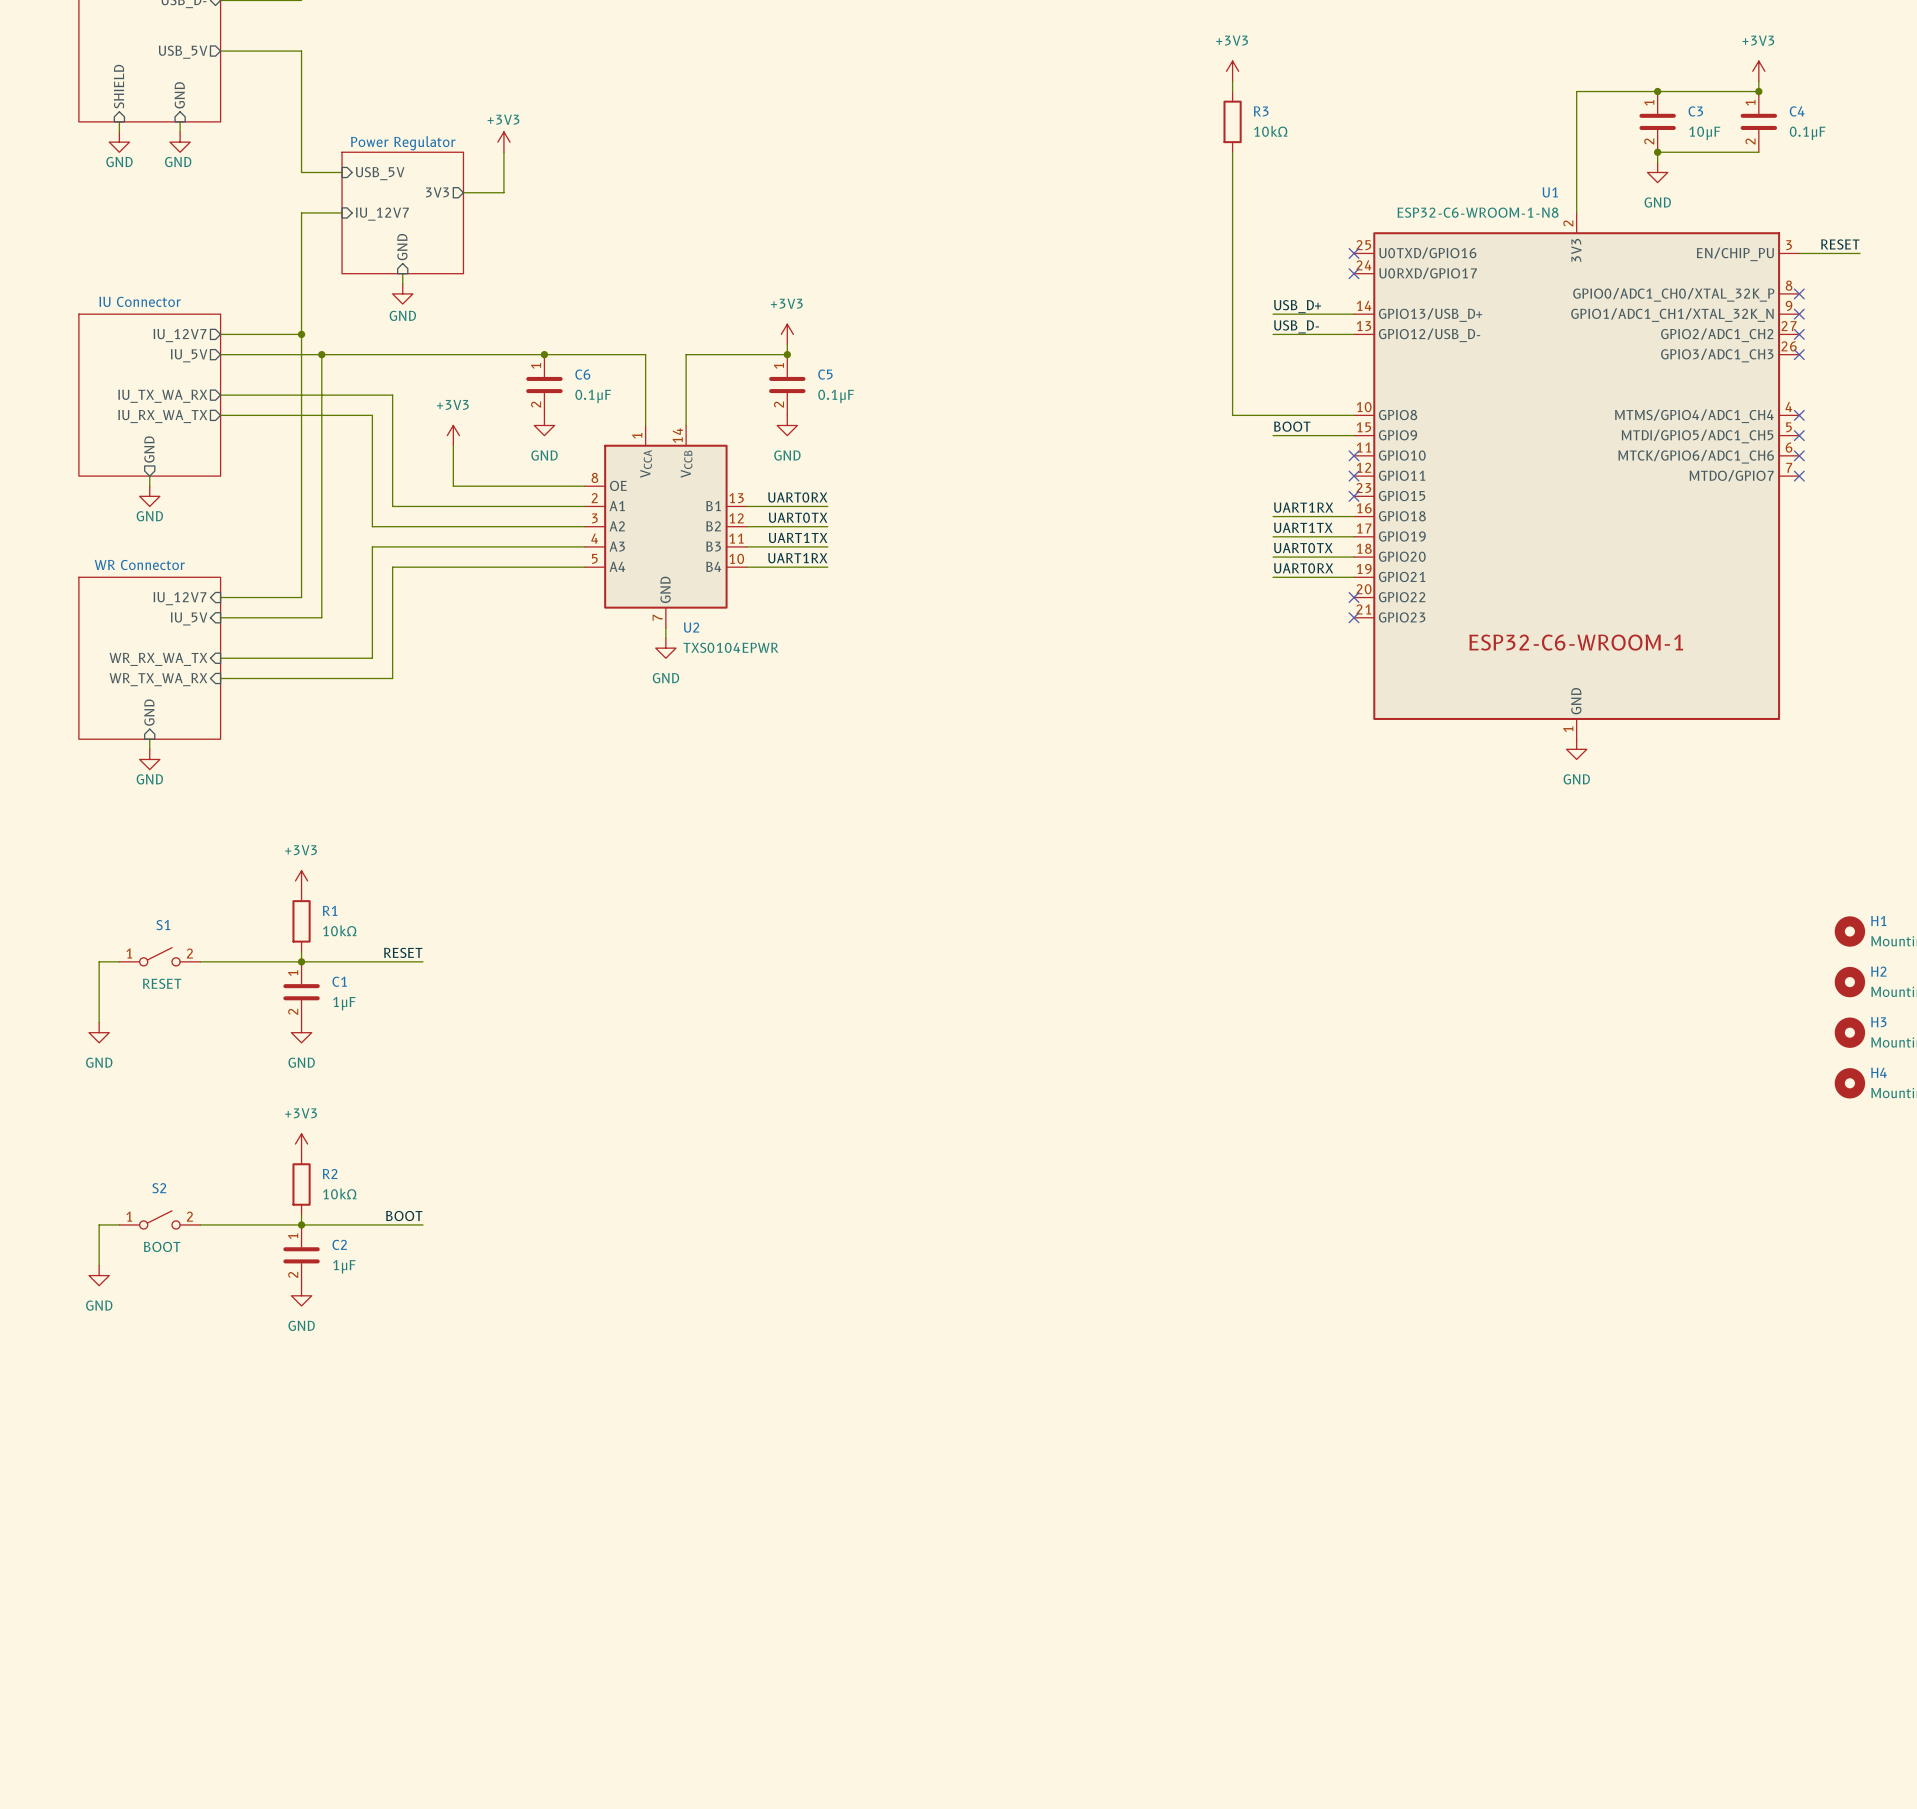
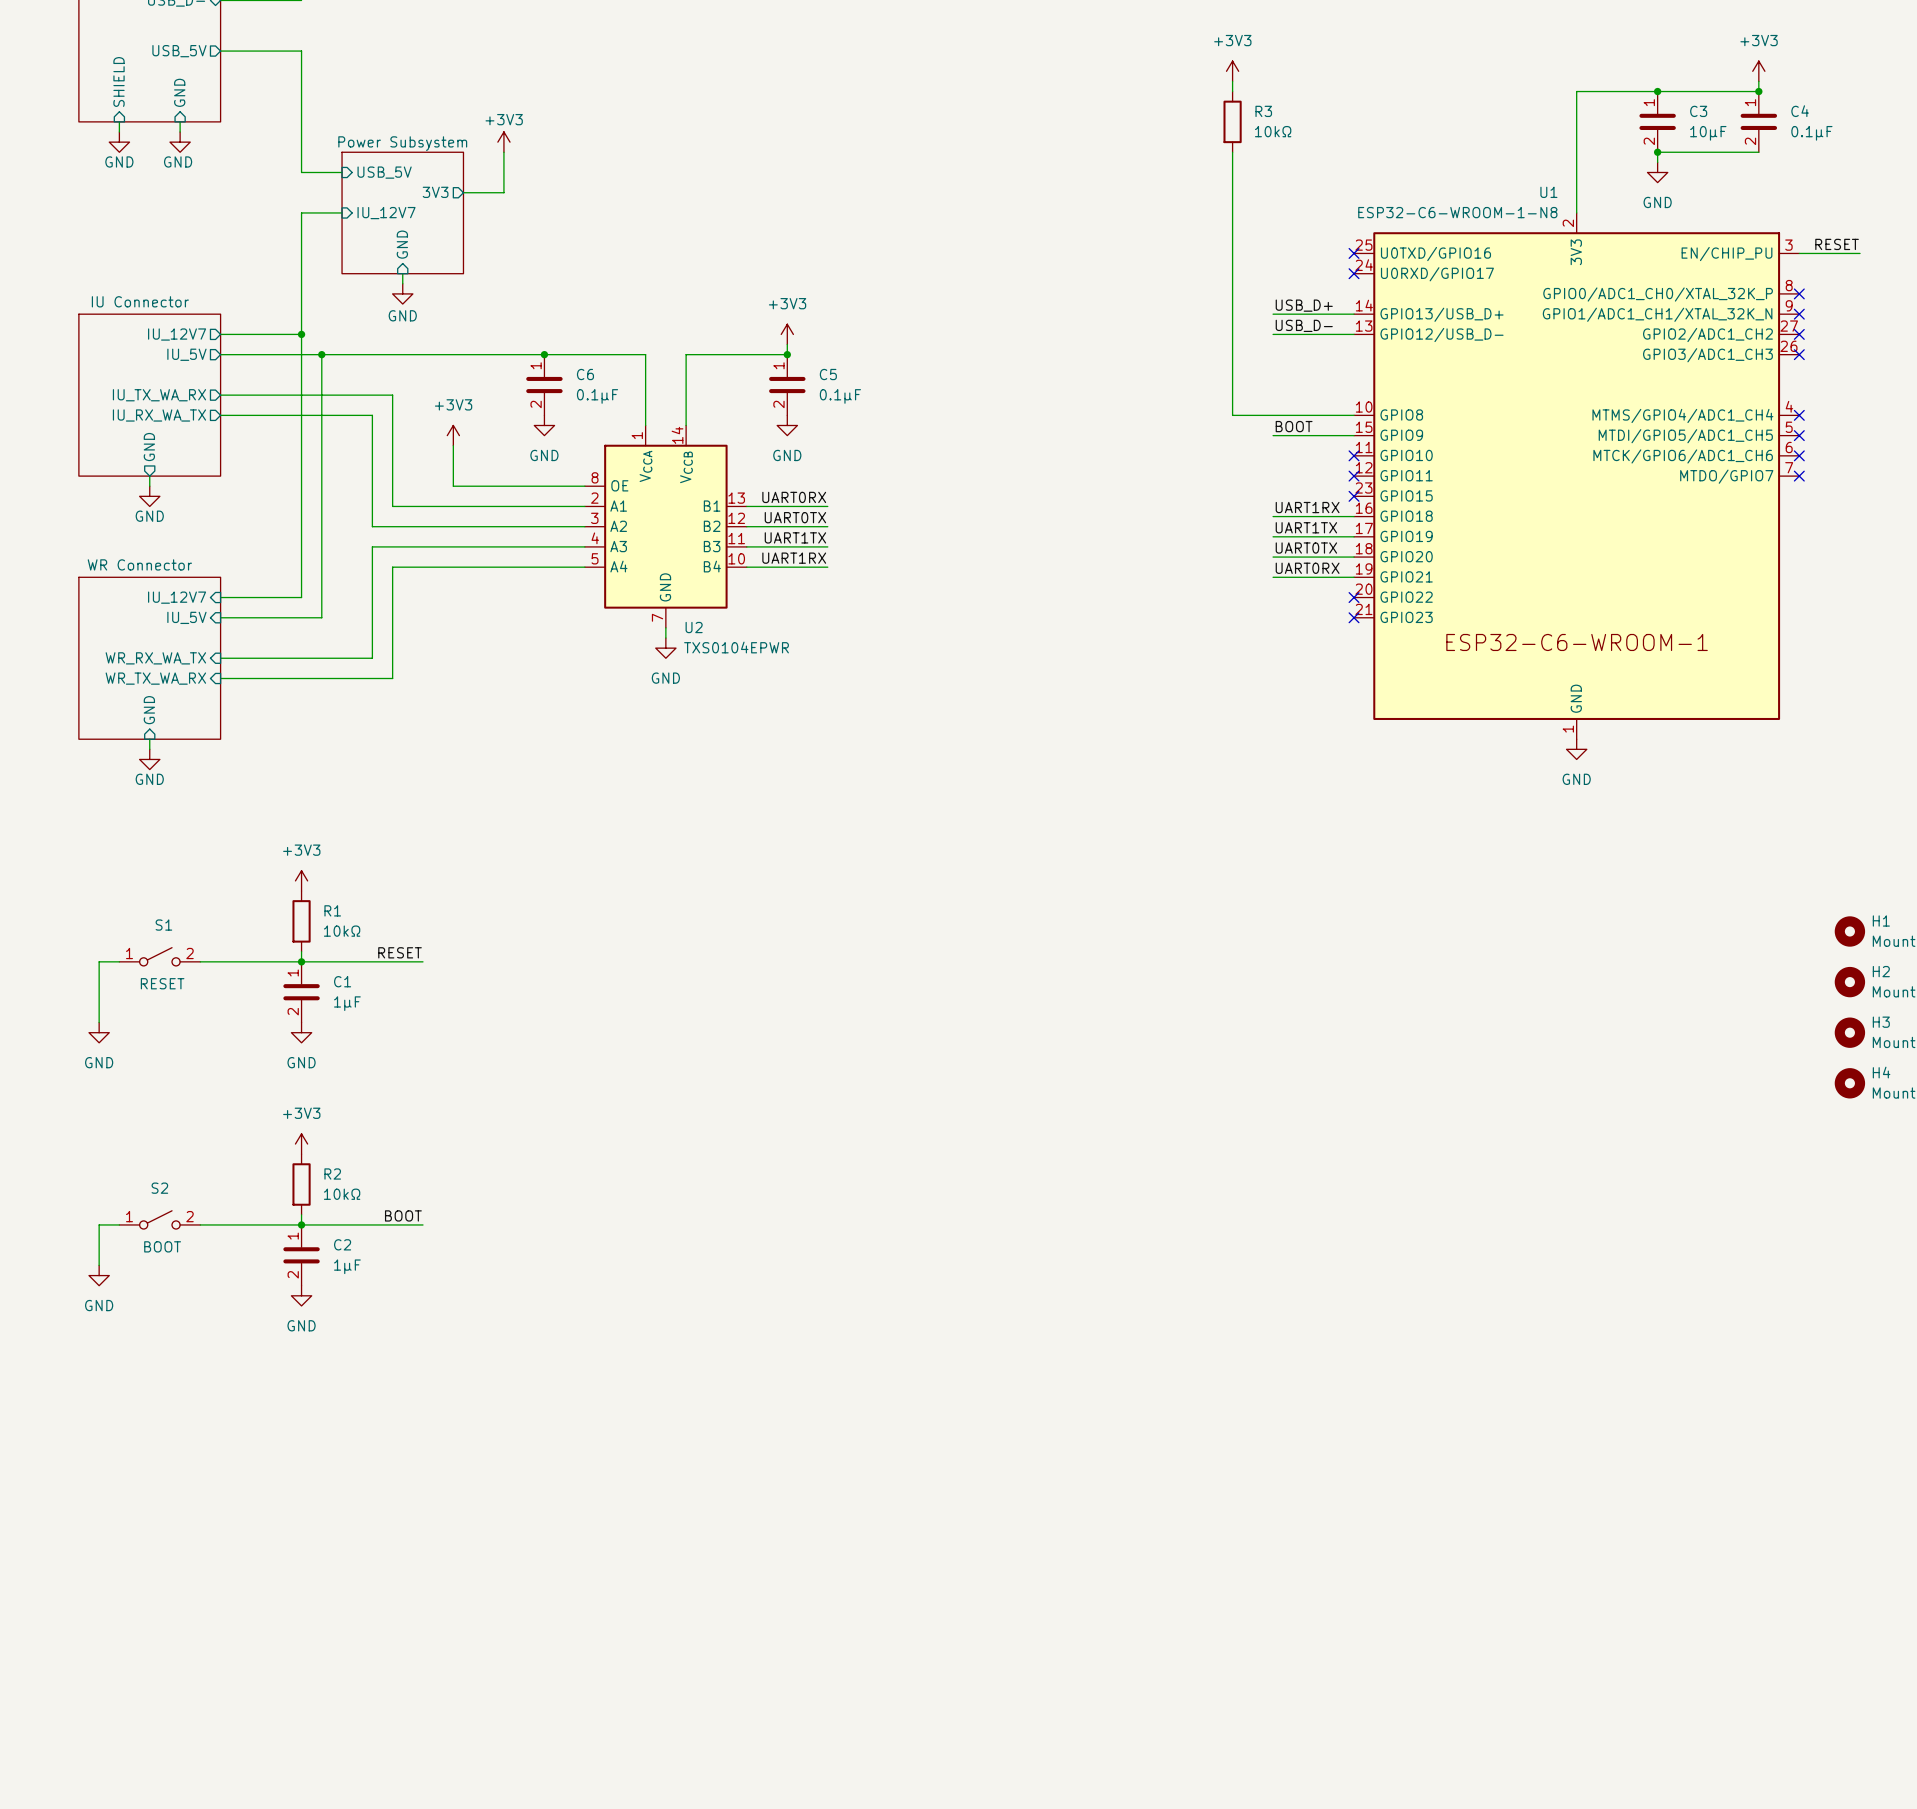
sheet Power Regulator name: Power Regulator (403, 143) -> Power Subsystem (402, 143)

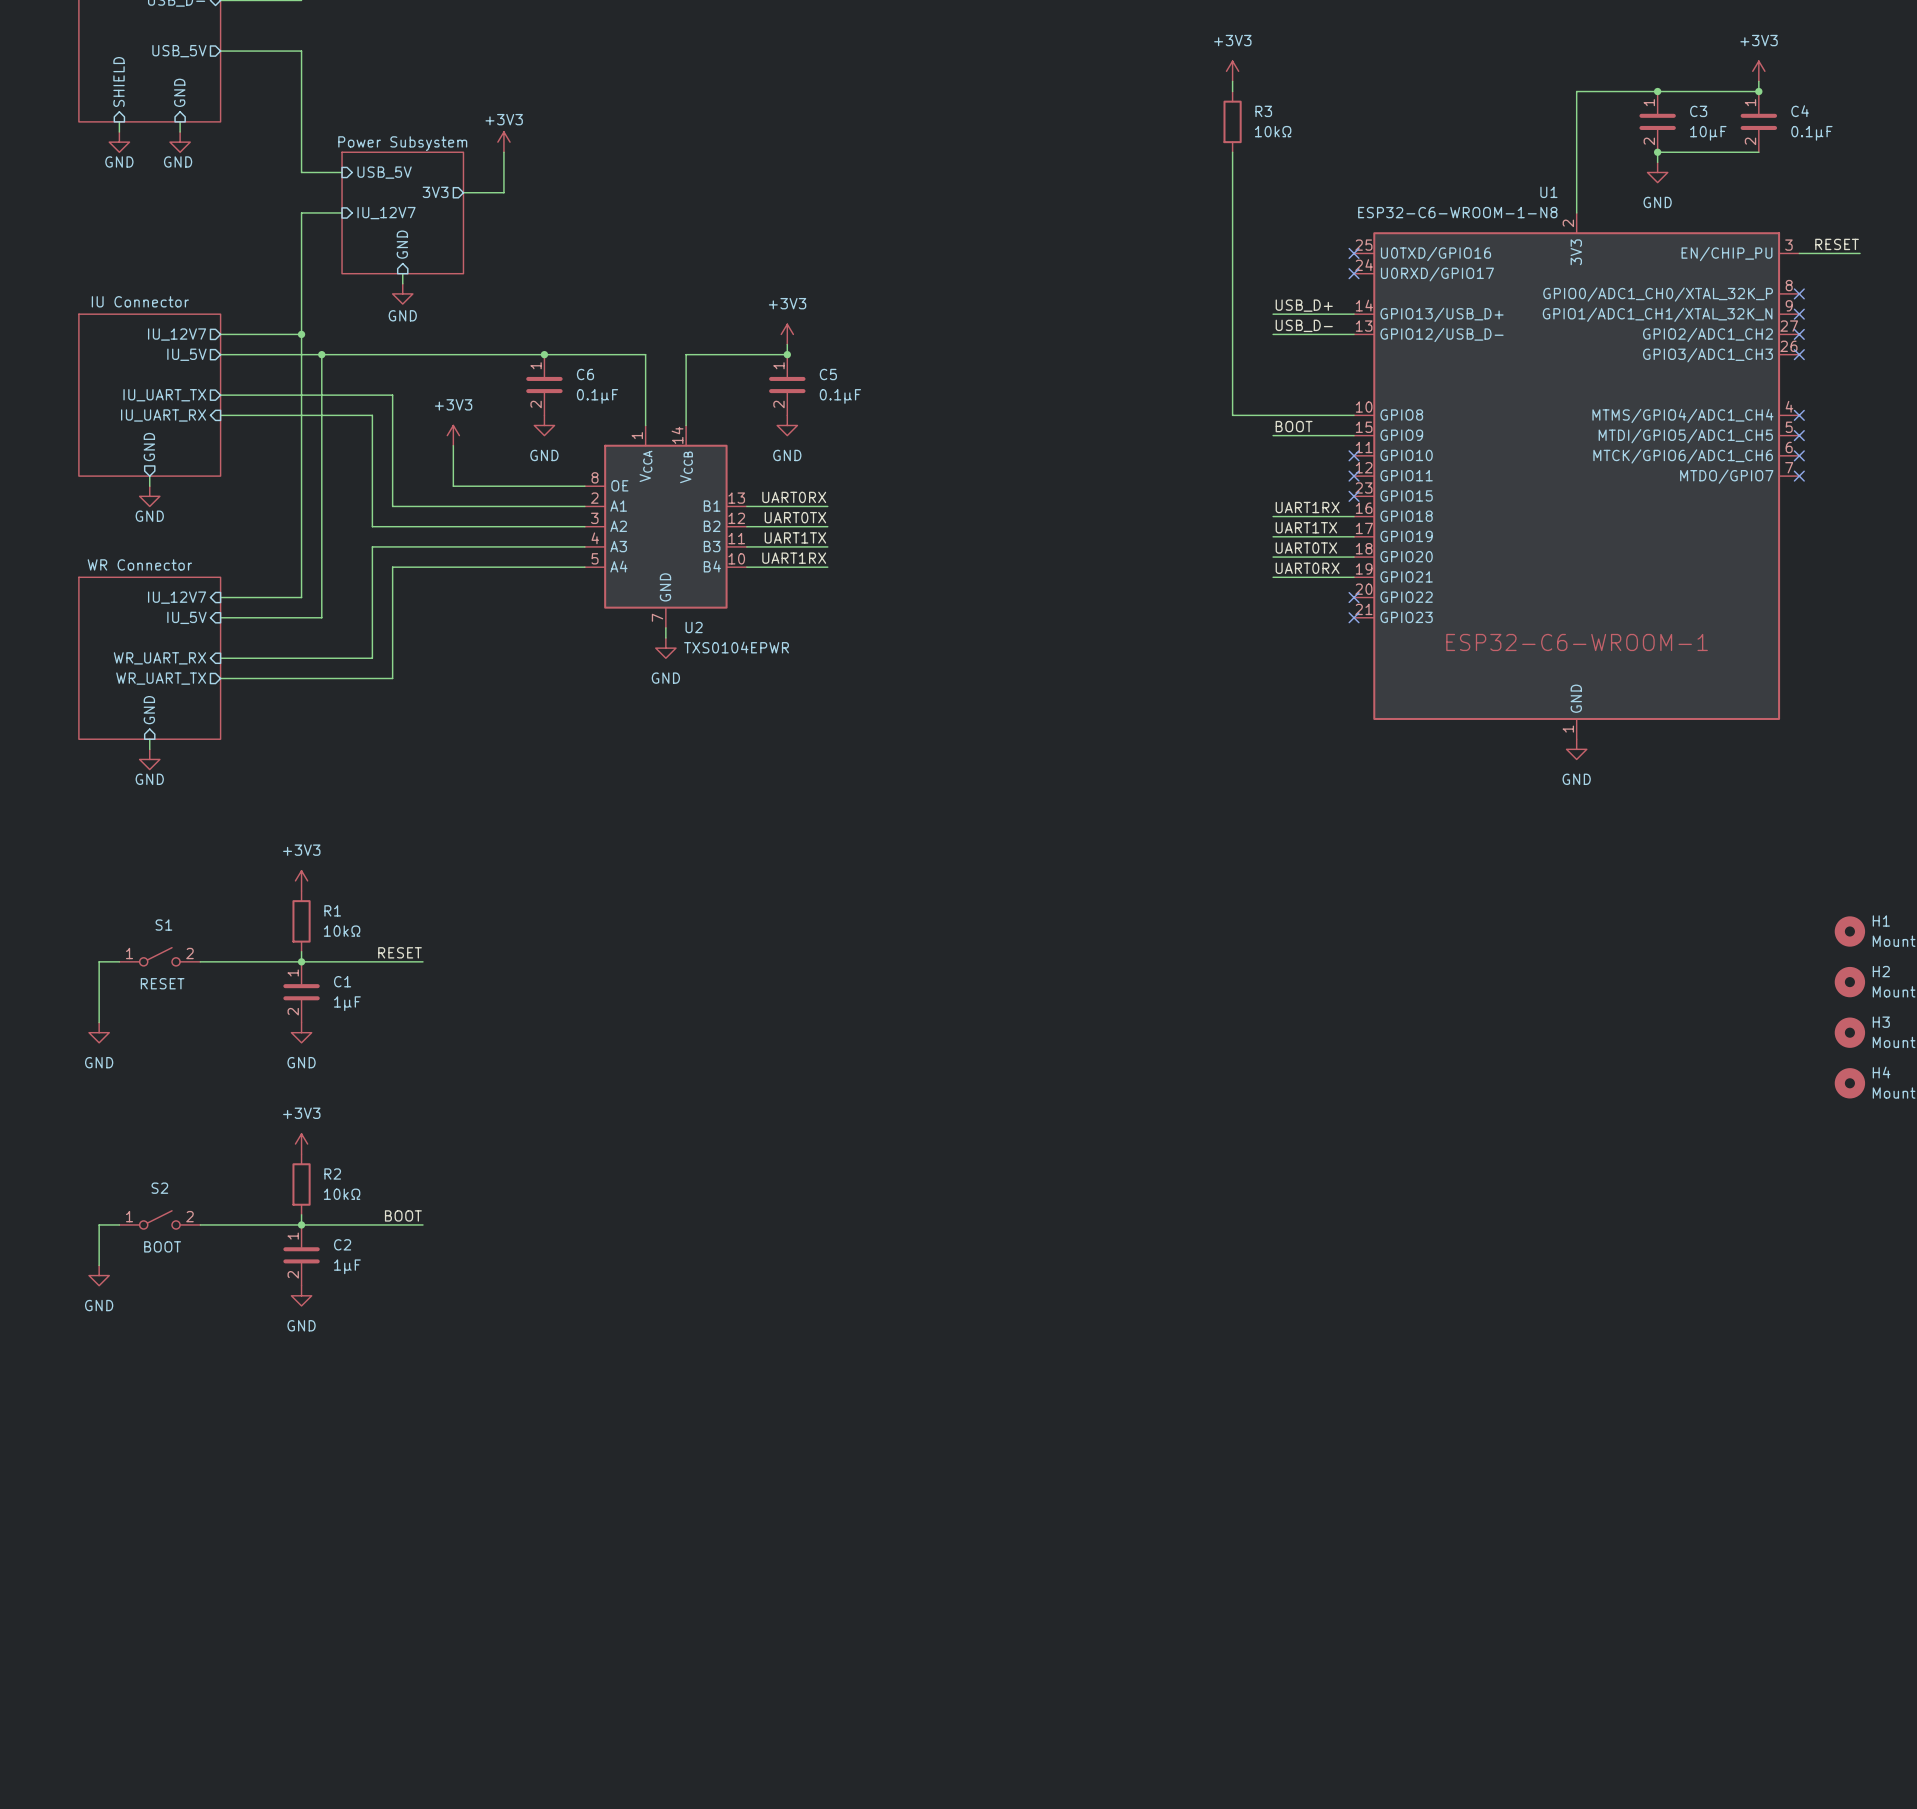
sheet pin: IU_TX_WA_RX (159, 395) -> IU_UART_TX (164, 395)
sheet pin shape: output (159, 415) -> input (163, 415)
sheet pin: IU_RX_WA_TX (159, 415) -> IU_UART_RX (163, 415)
sheet pin: WR_RX_WA_TX (155, 658) -> WR_UART_RX (159, 658)
sheet pin shape: input (155, 678) -> output (161, 678)
sheet pin: WR_TX_WA_RX (155, 678) -> WR_UART_TX (161, 678)

